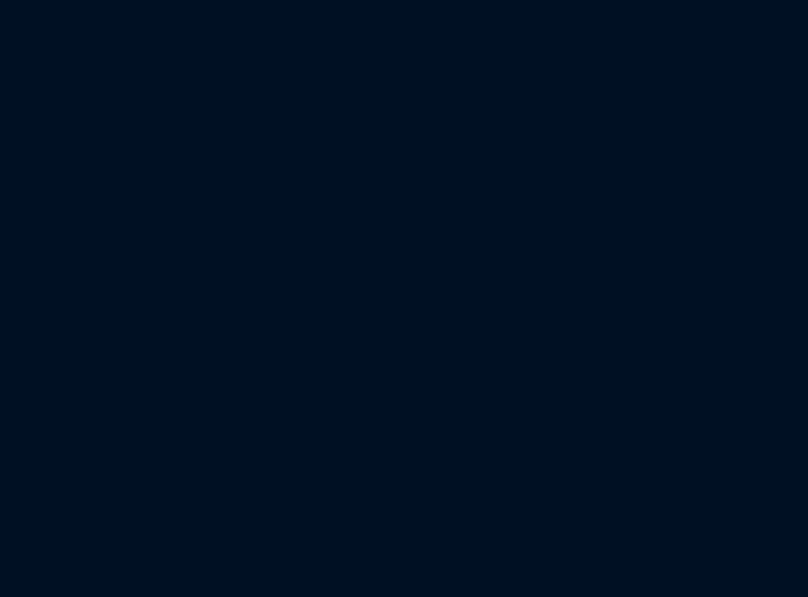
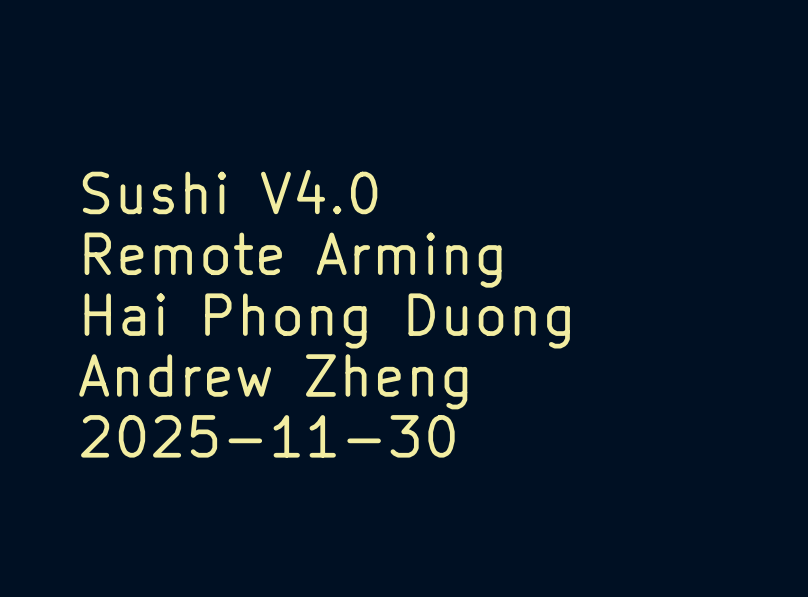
text: none -> Sushi V4.0 (230, 192)
text: none -> Remote Arming (293, 260)
text: none -> Hai Phong Duong (327, 320)
text: none -> Andrew Zheng (273, 381)
text: none -> 2025-11-30 (267, 436)

